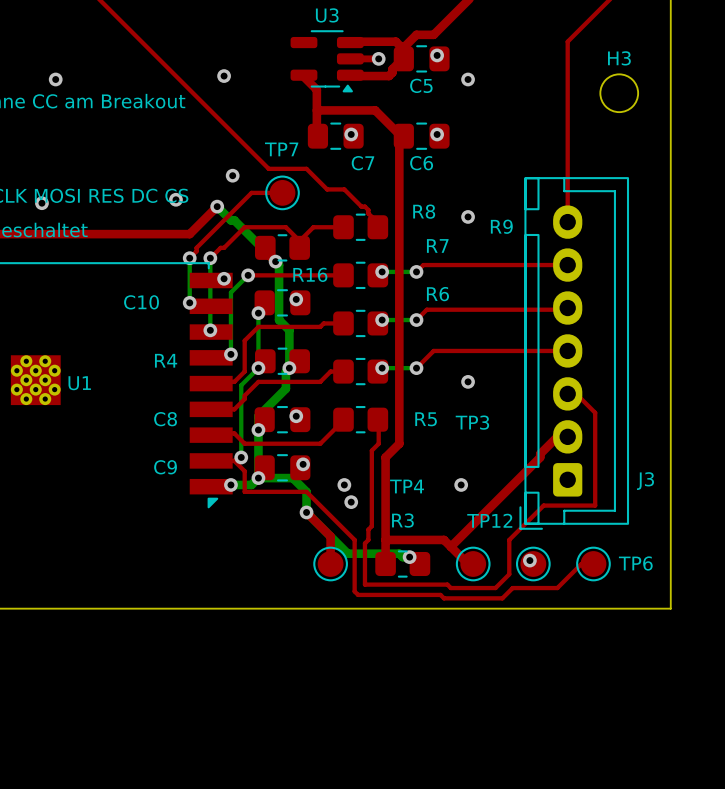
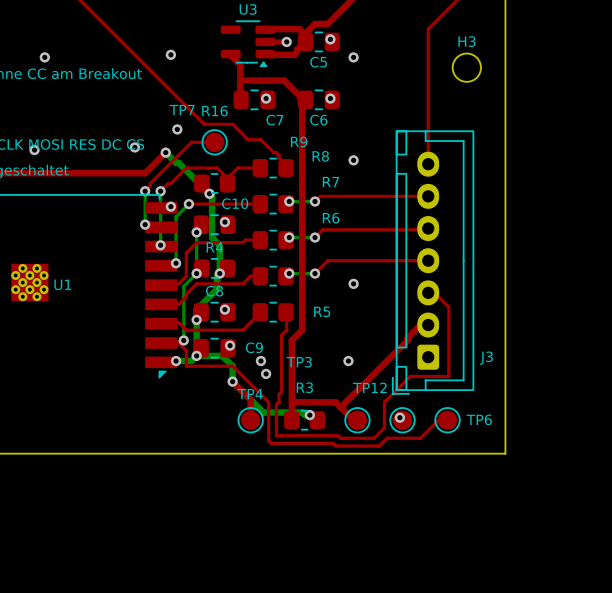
TP7 name position: TP7 (281, 149) -> TP7 (182, 110)
R9 name position: R9 (501, 226) -> R9 (299, 141)
R16 name position: R16 (310, 274) -> R16 (214, 111)
C10 name position: C10 (141, 302) -> C10 (235, 203)
R4 name position: R4 (166, 360) -> R4 (214, 247)
C8 name position: C8 (165, 419) -> C8 (214, 291)
TP3 name position: TP3 (472, 422) -> TP3 (299, 362)
C9 name position: C9 (165, 467) -> C9 (254, 347)
TP4 name position: TP4 (407, 486) -> TP4 (250, 394)

